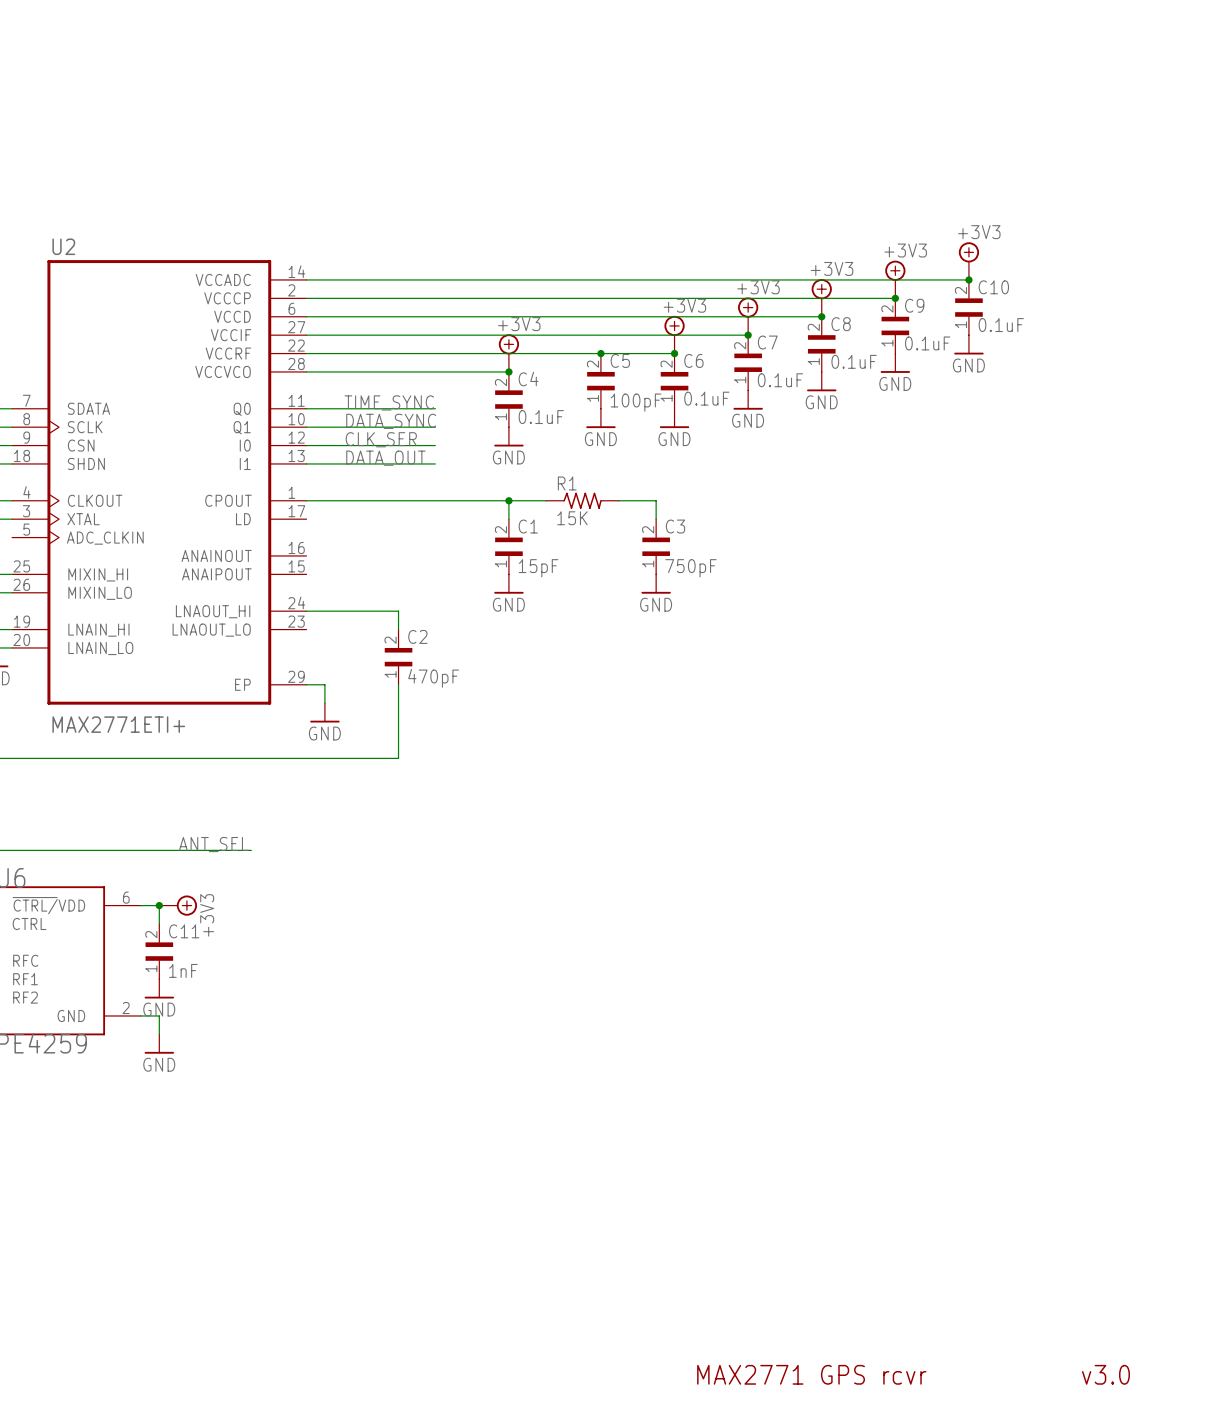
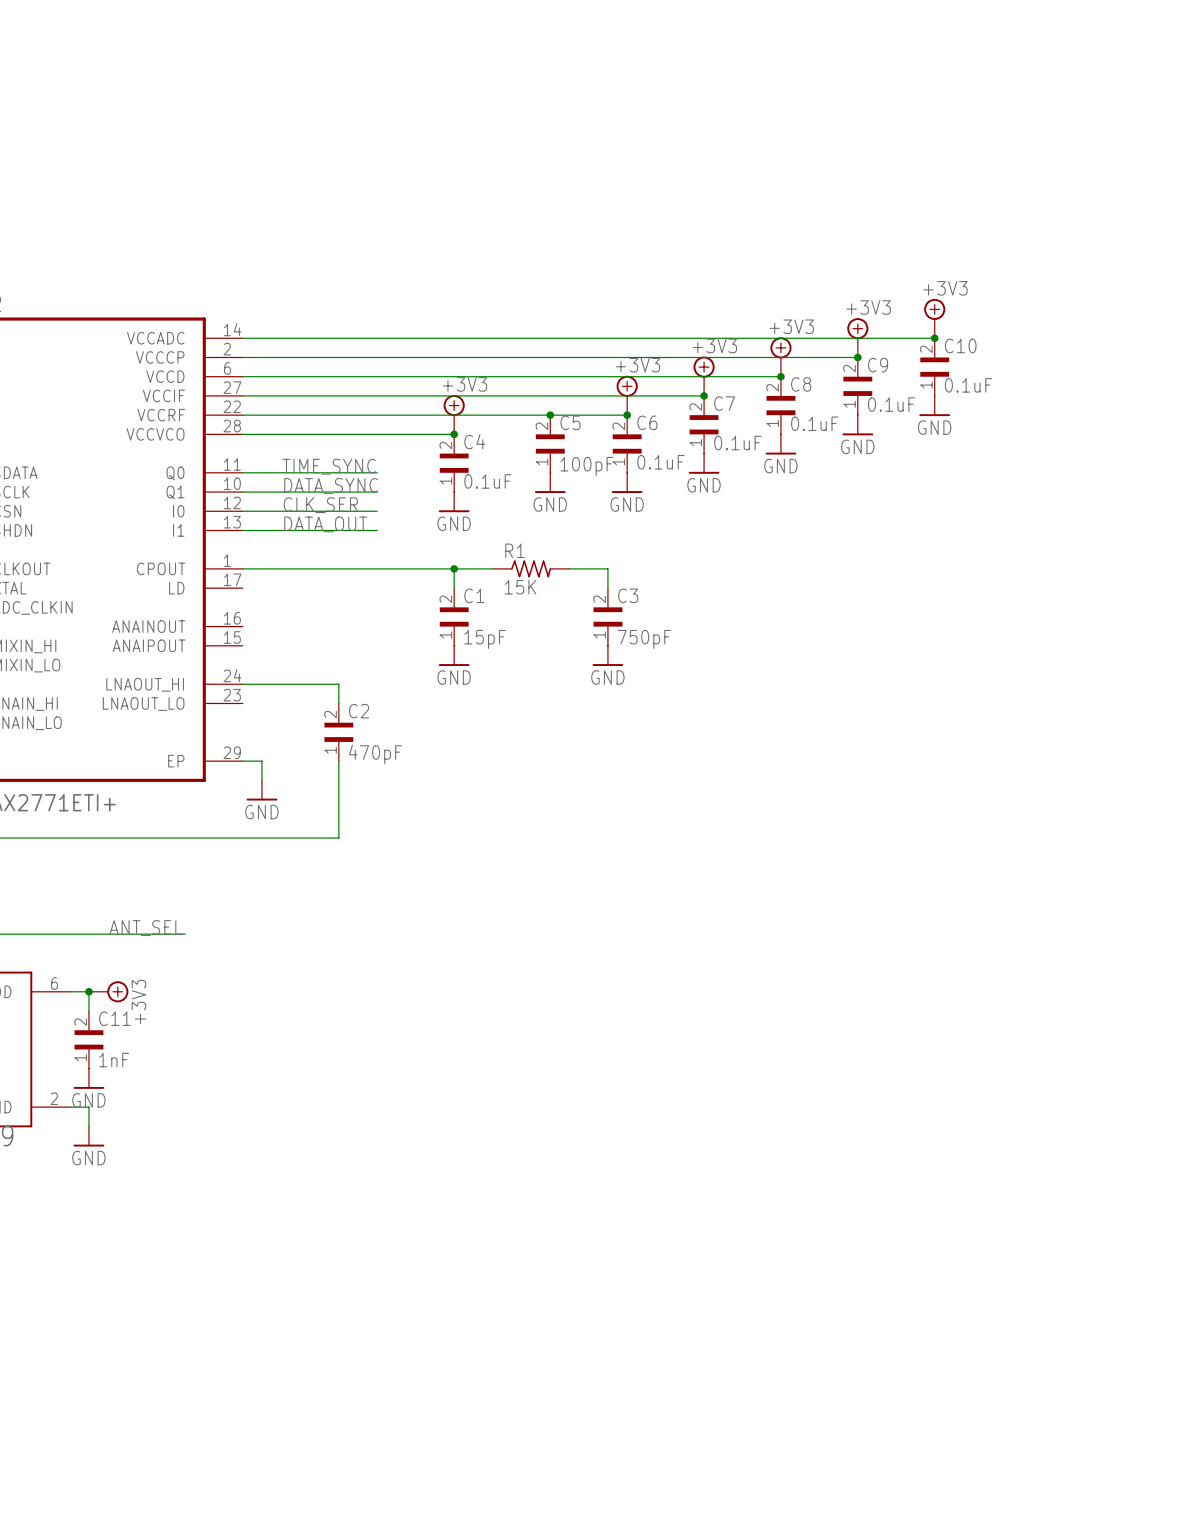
text: MAX2771 GPS rcvr (811, 1374) -> none
text: v3.0 (1105, 1374) -> none

